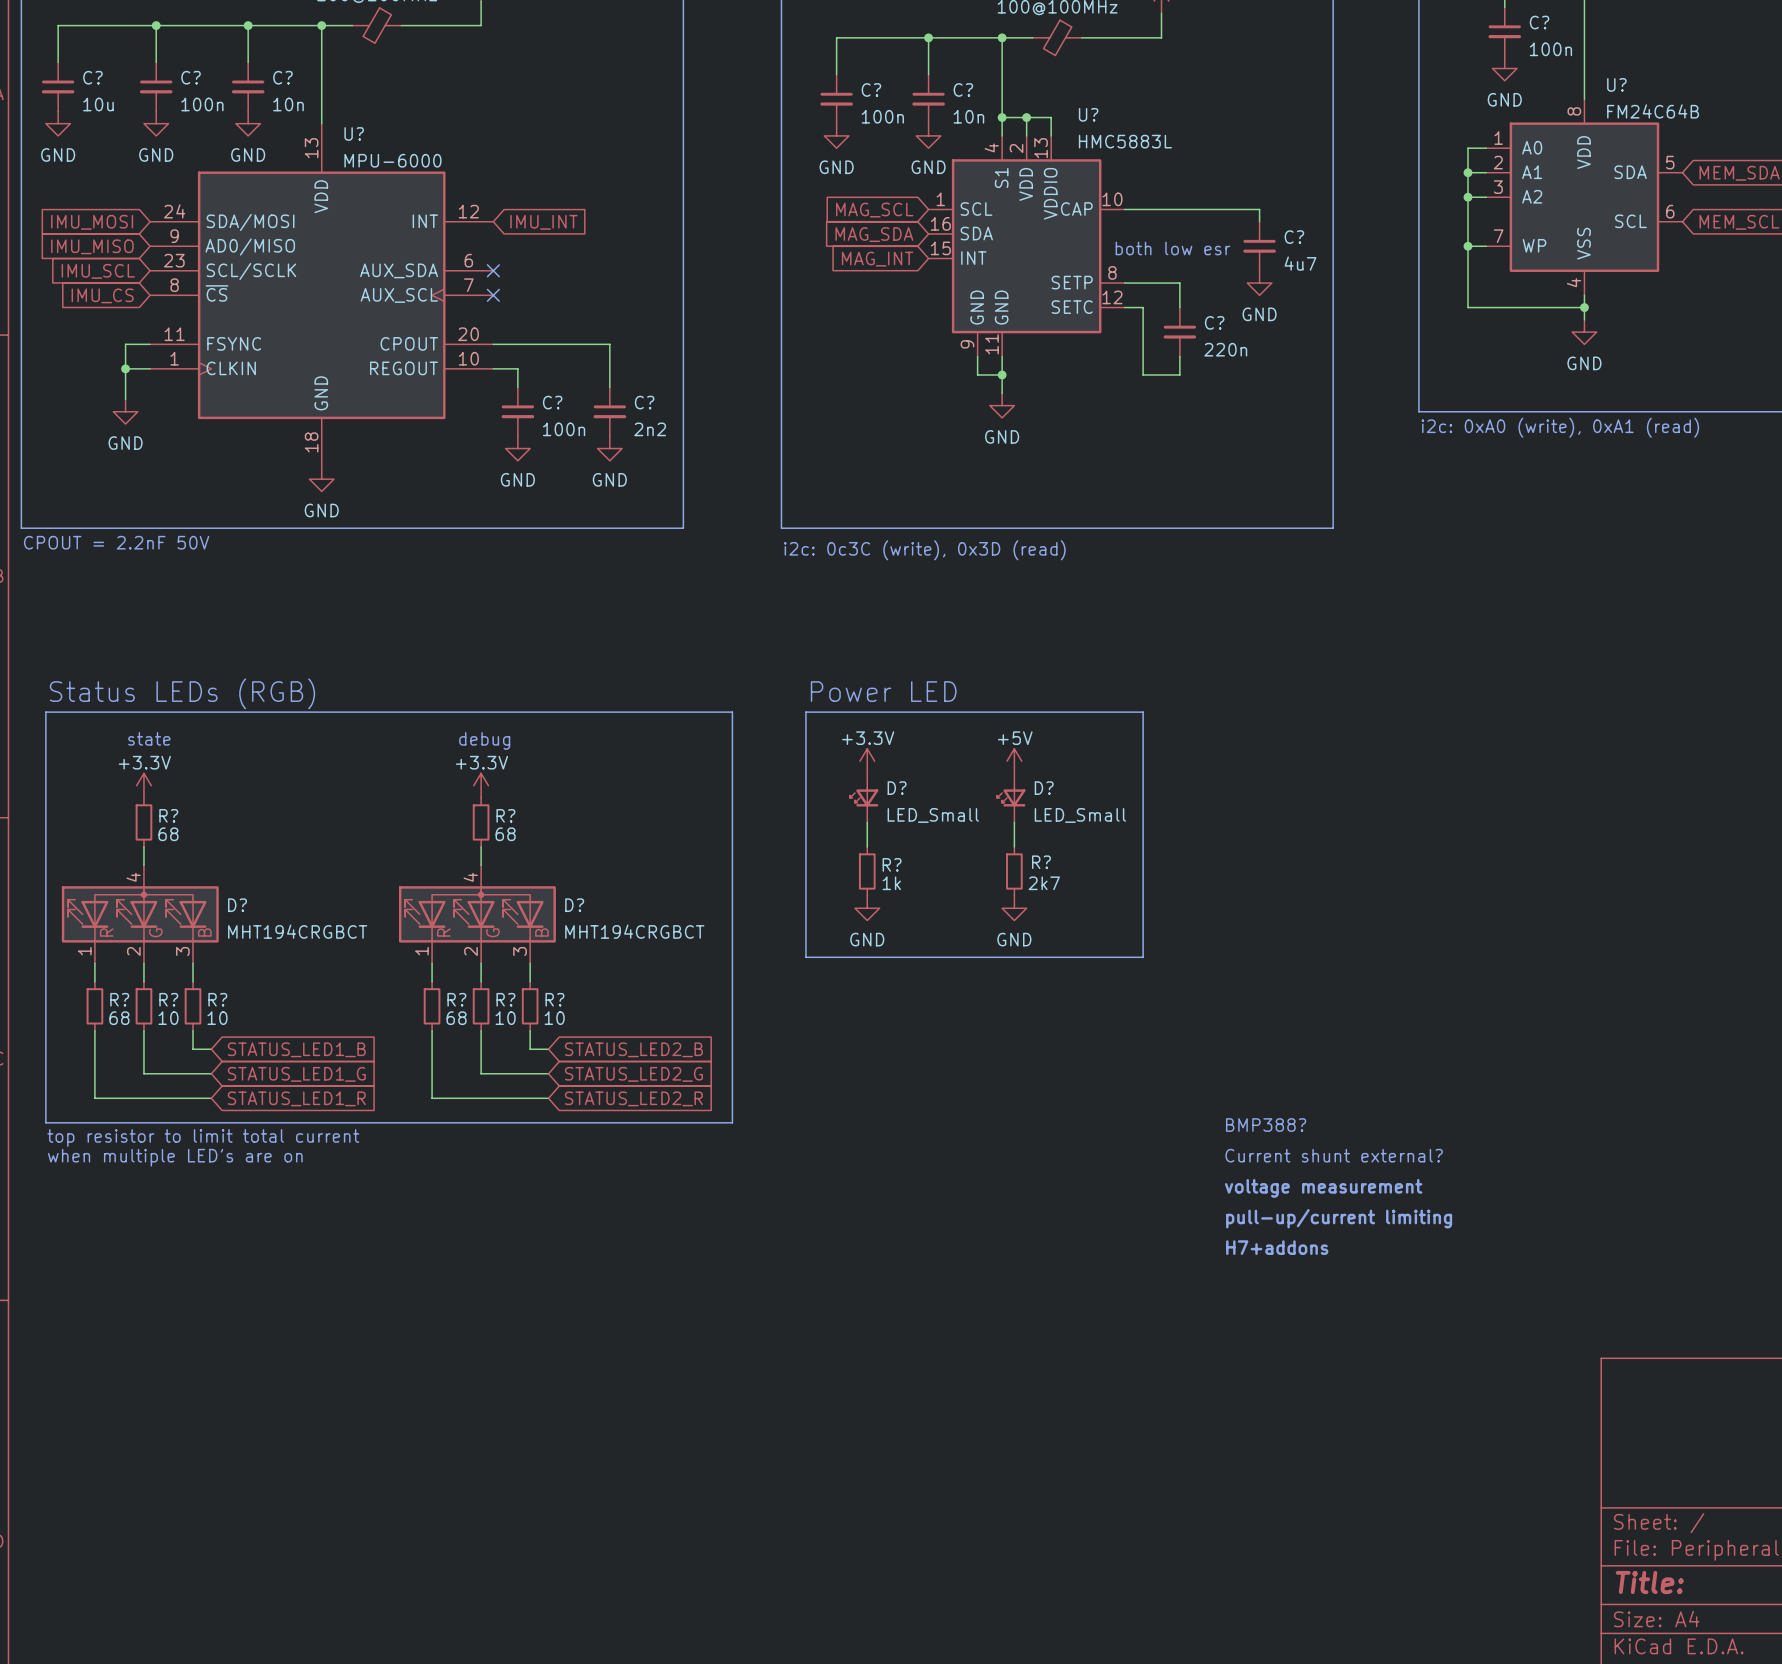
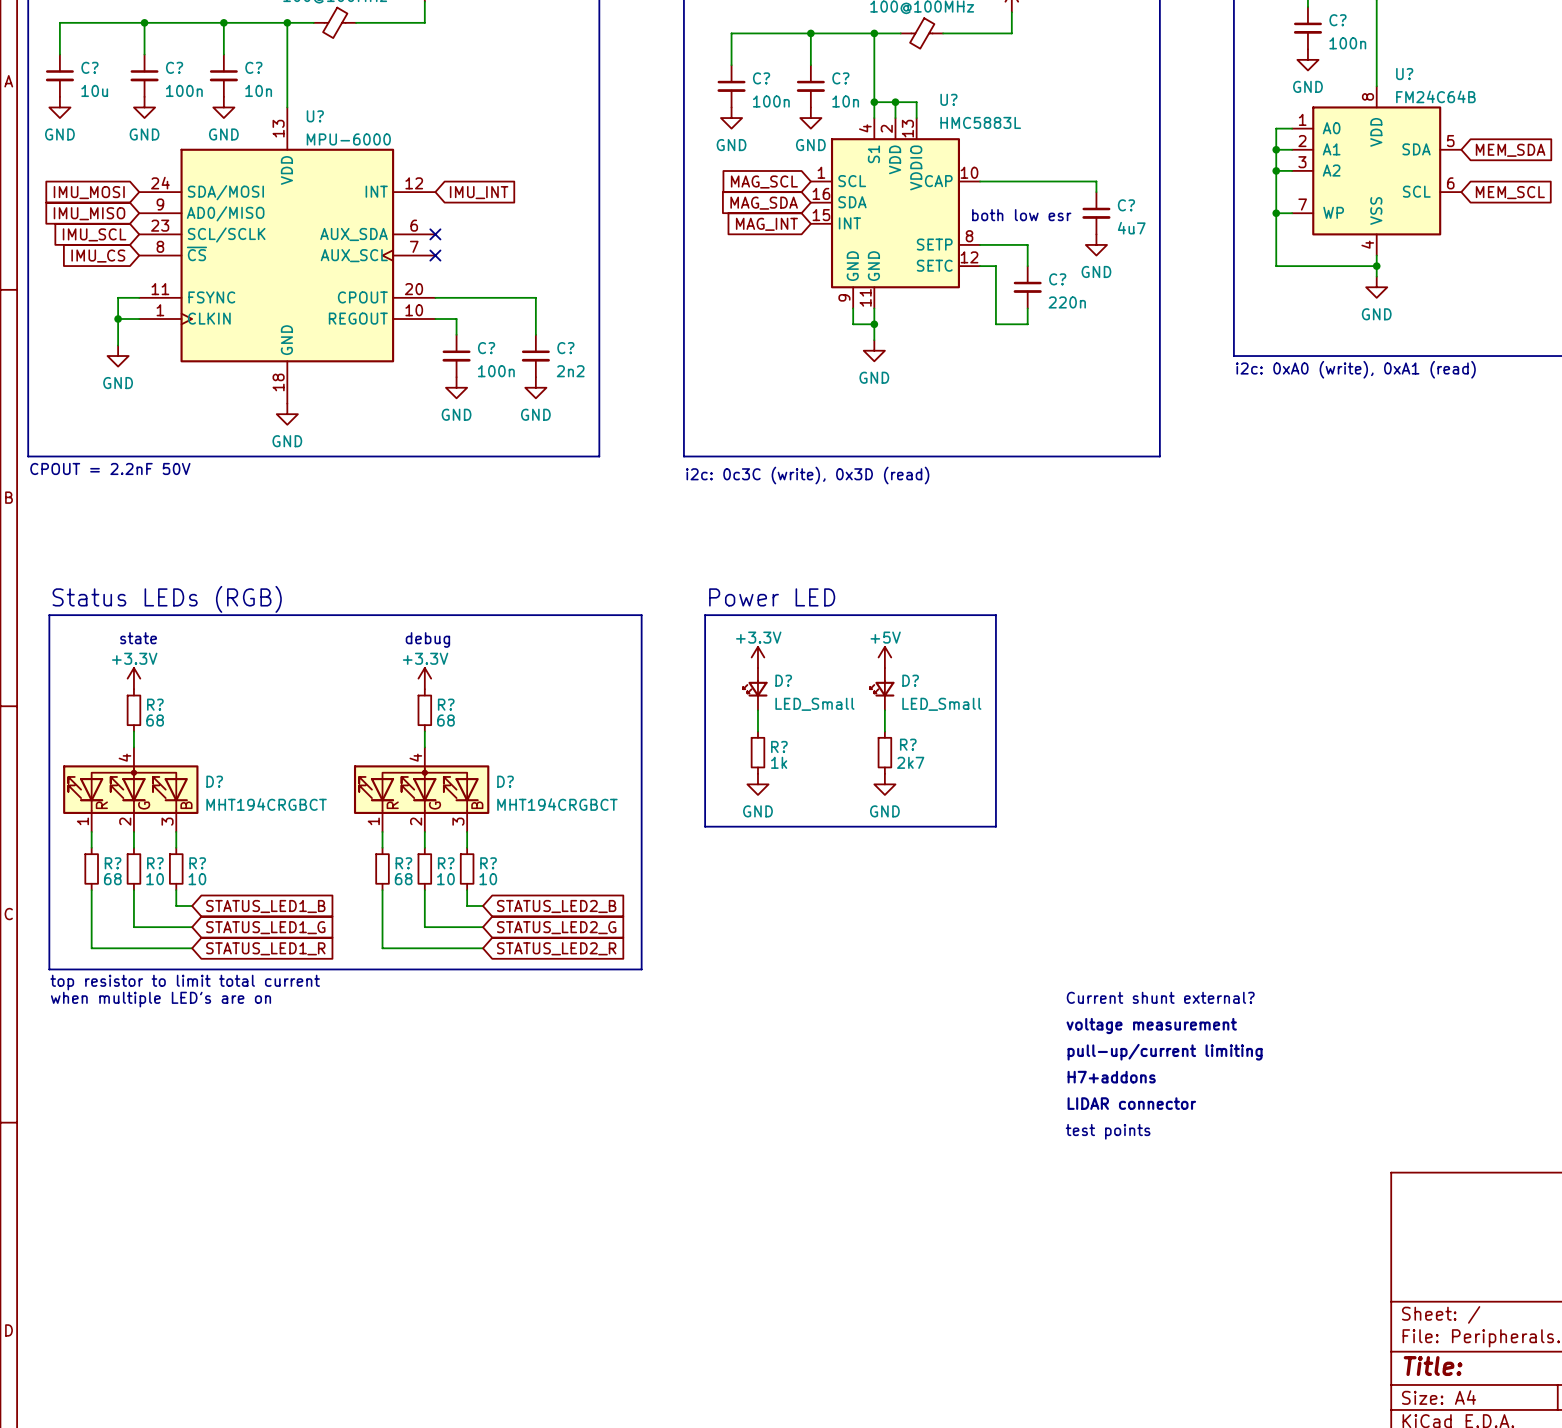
text: BMP388? (1266, 1125) -> none
text: none -> LIDAR connector (1131, 1103)
text: none -> test points (1108, 1131)

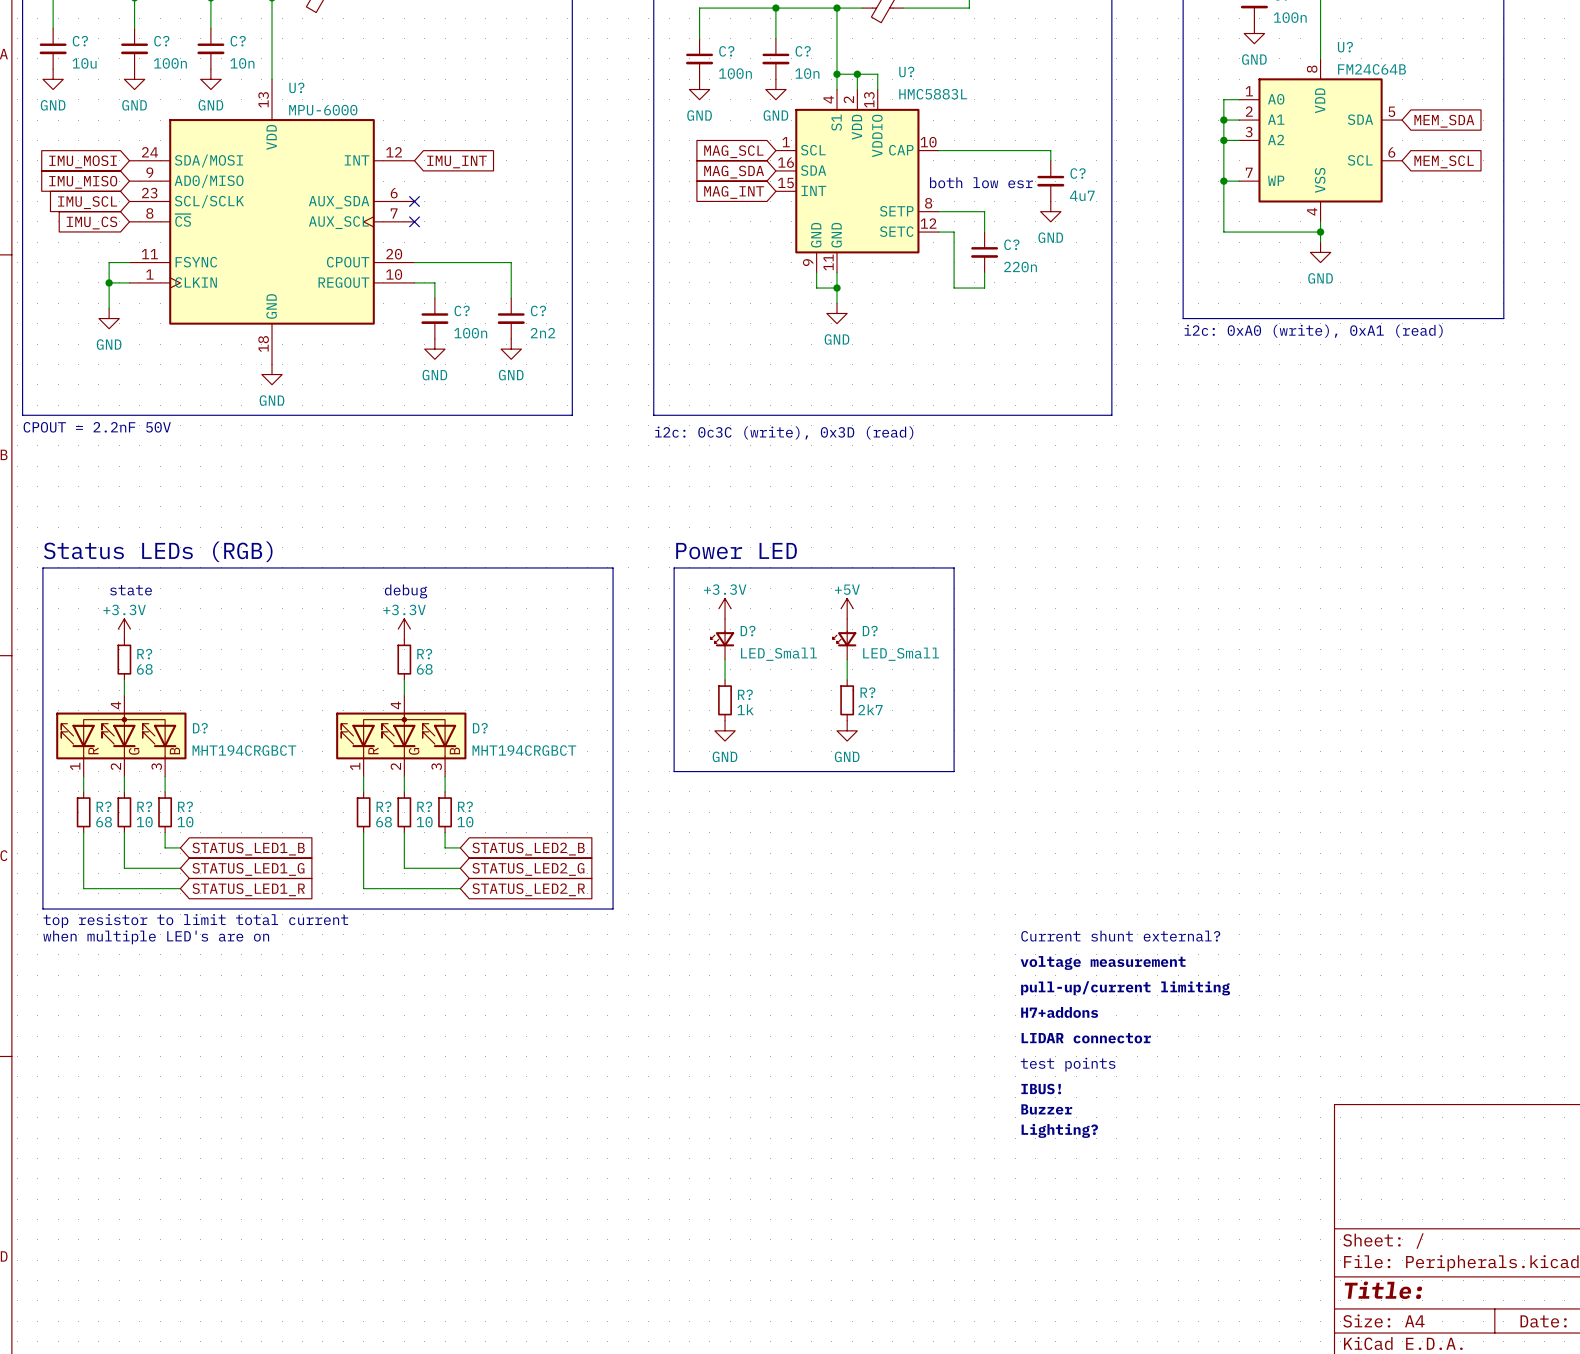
text: none -> IBUS! (1041, 1089)
text: none -> Buzzer (1046, 1109)
text: none -> Lighting? (1059, 1130)

